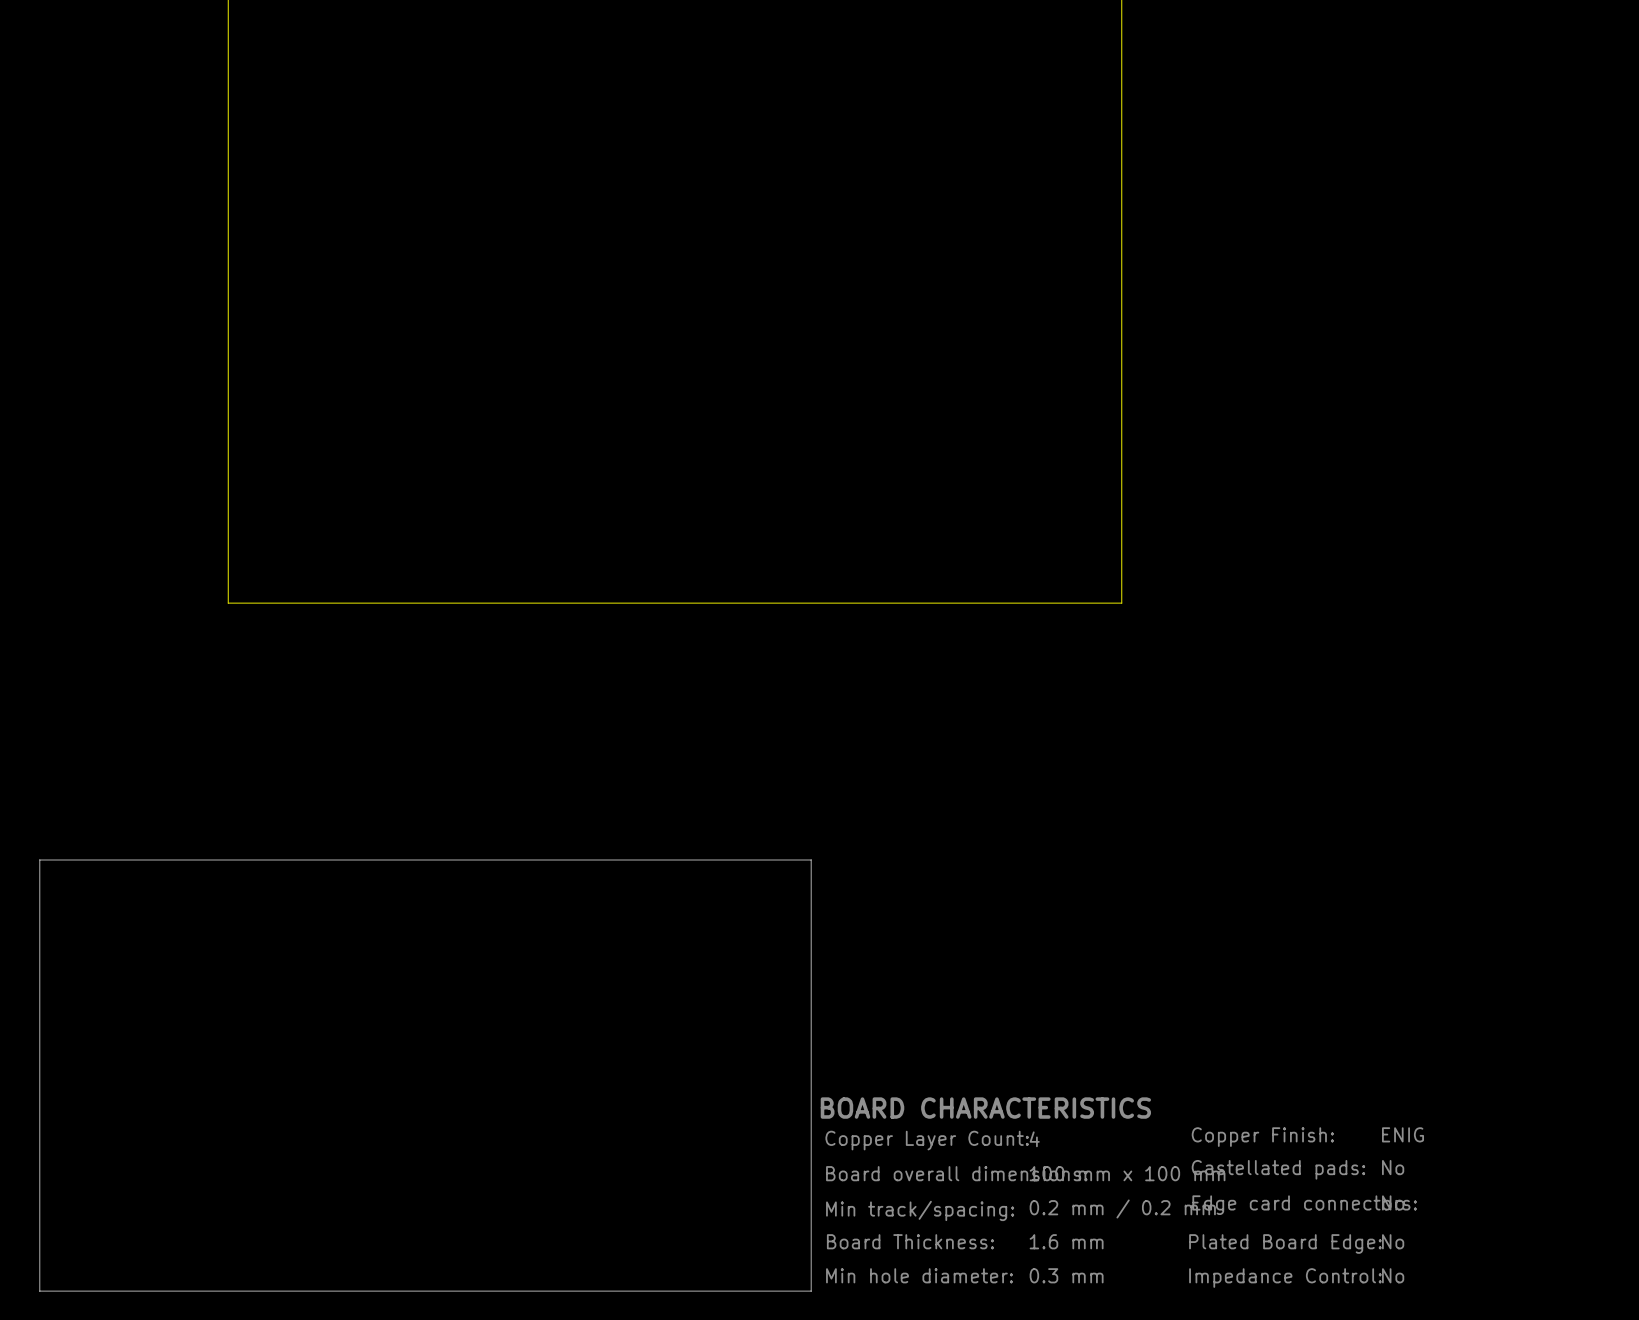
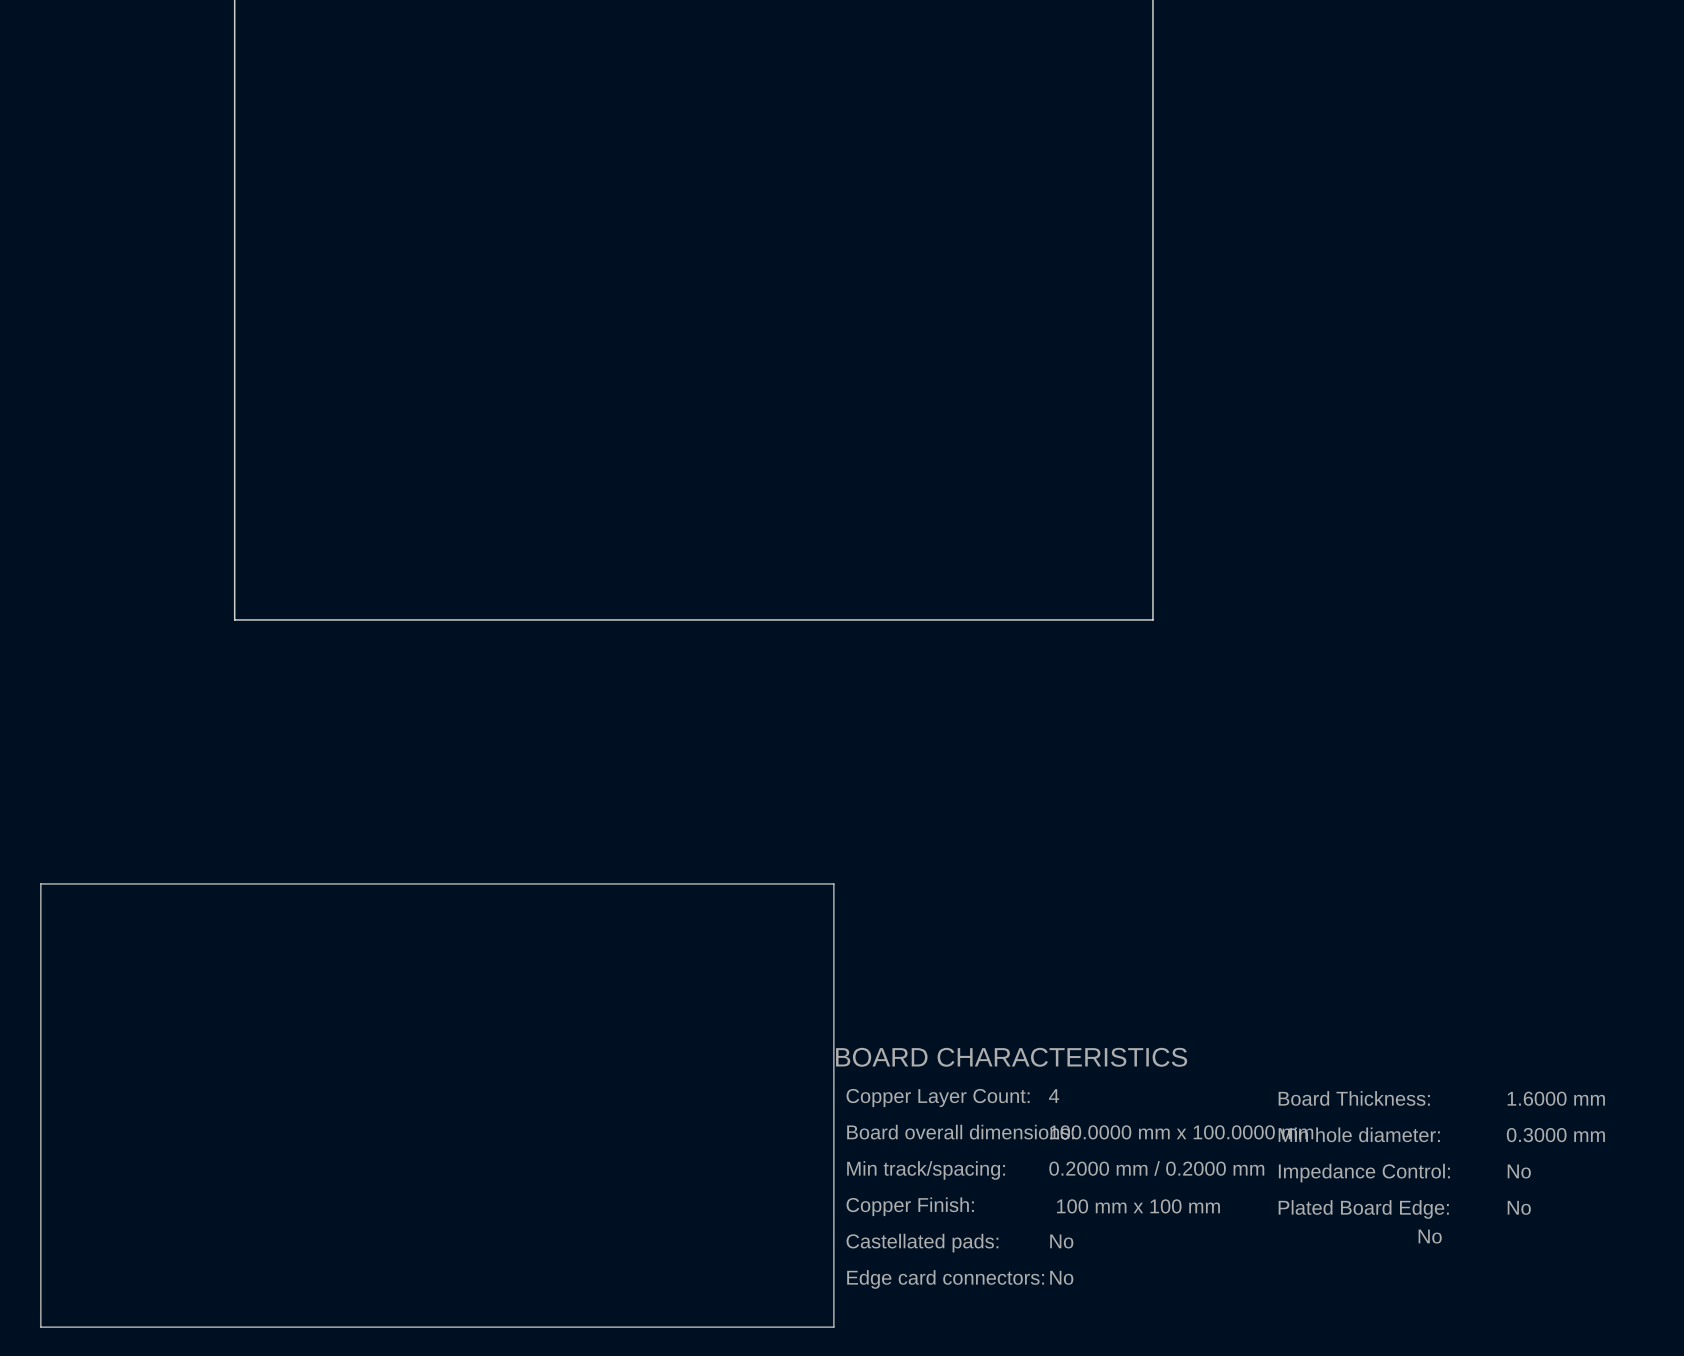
text: none -> Board Thickness: (1354, 1098)
text: none -> 1.6000 mm (1556, 1098)
text: none -> 100.0000 mm x 100.0000 mm (1181, 1132)
text: none -> Min hole diameter: (1359, 1134)
text: none -> 0.3000 mm (1555, 1135)
text position: BOARD CHARACTERISTICS (985, 1108) -> BOARD CHARACTERISTICS (1011, 1057)
text: ENIG (1403, 1134) -> none
text: Copper Finish: (1262, 1137) -> none
text: none -> 0.2000 mm / 0.2000 mm (1156, 1168)
text position: 4 (1034, 1139) -> 4 (1054, 1096)
text: none -> No (1519, 1171)
text position: Copper Layer Count: (927, 1140) -> Copper Layer Count: (938, 1098)
text: No (1393, 1167) -> none
text: Castellated pads: (1278, 1169) -> none
text position: Board overall dimensions: (956, 1173) -> Board overall dimensions: (960, 1132)
text: none -> Copper Finish: (910, 1206)
text: none -> No (1519, 1207)
text: Edge card connectors: (1304, 1205) -> none
text: 0.2 mm / 0.2 mm (1122, 1208) -> No (1061, 1241)
text: none -> Castellated pads: (922, 1243)
text position: Min track/spacing: (920, 1210) -> Min track/spacing: (926, 1170)
text: Board Thickness: (910, 1241) -> Edge card connectors: (945, 1279)
text: 1.6 mm (1066, 1241) -> No (1061, 1277)
text: No (1393, 1241) -> none
text position: Plated Board Edge: (1285, 1243) -> Plated Board Edge: (1363, 1209)
text: Min hole diameter: (919, 1275) -> none
text: 0.3 mm (1066, 1275) -> none
text: No (1393, 1275) -> none
text position: Impedance Control: (1285, 1278) -> Impedance Control: (1364, 1173)

